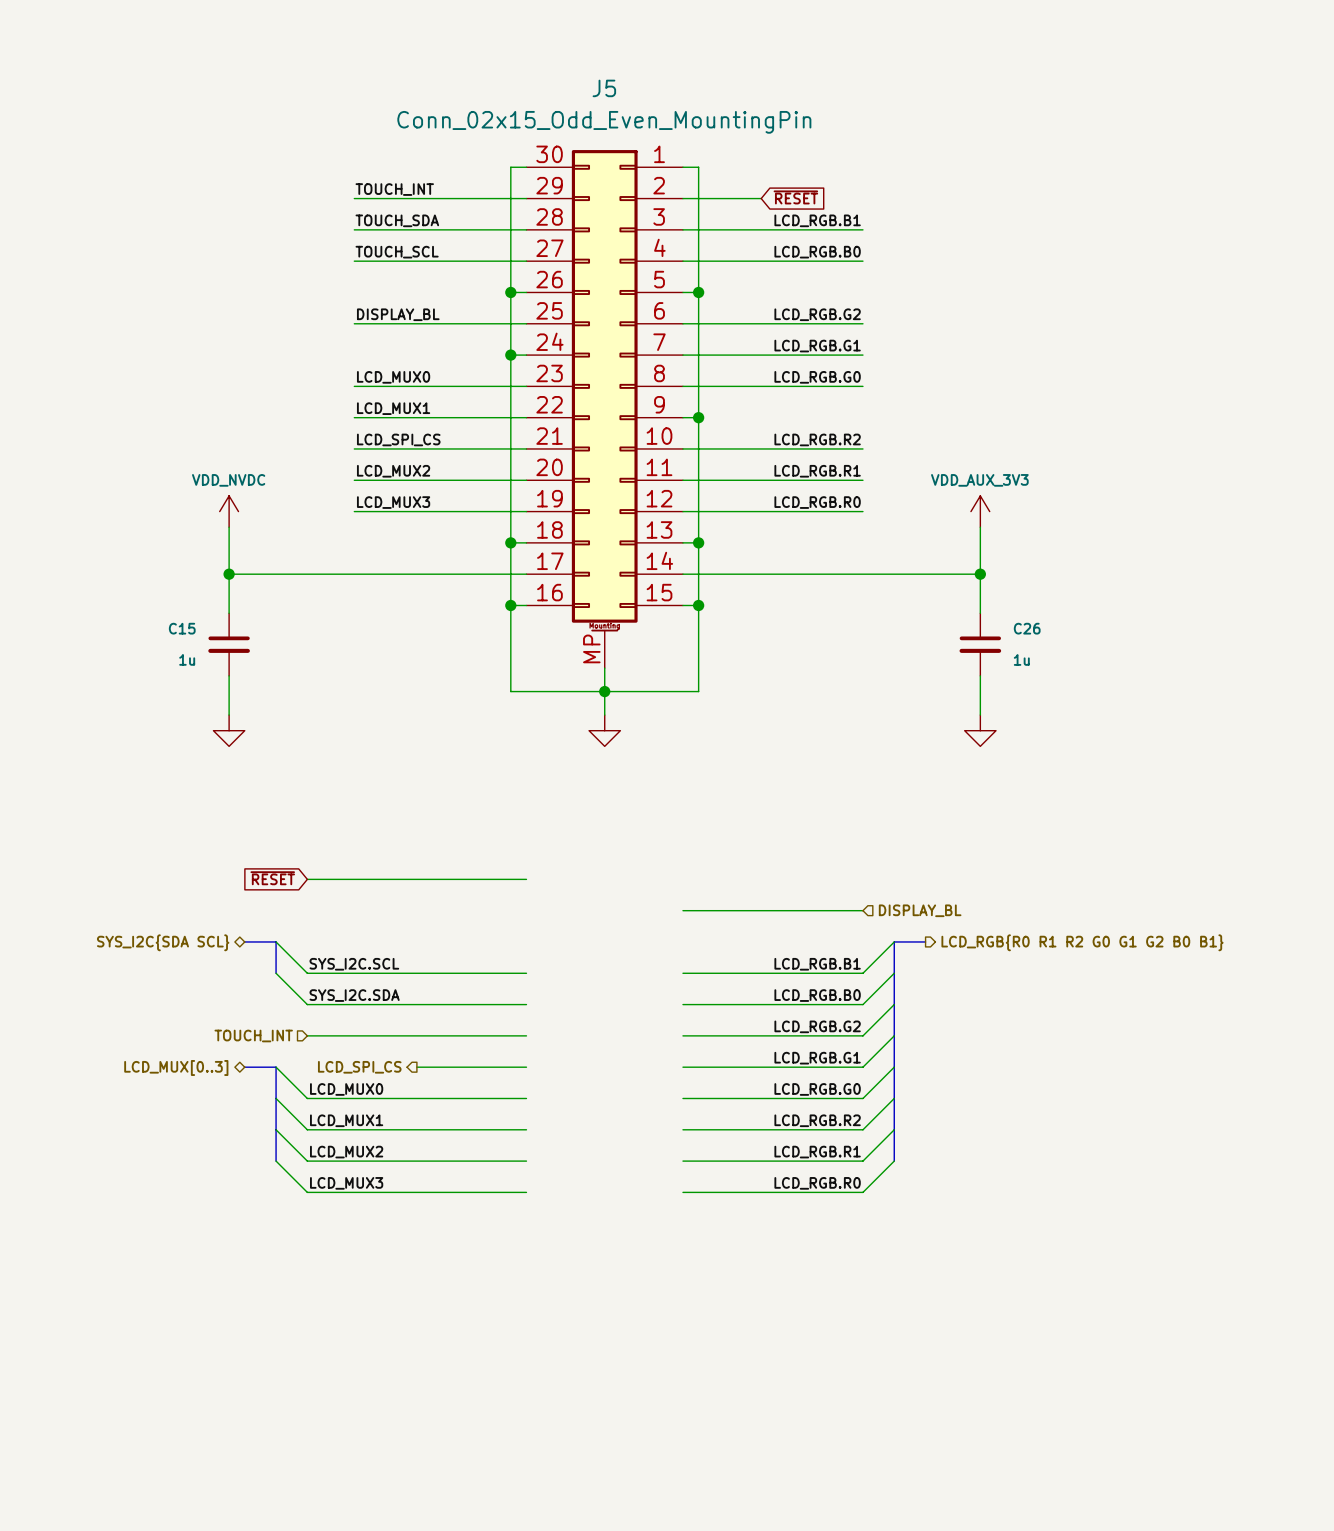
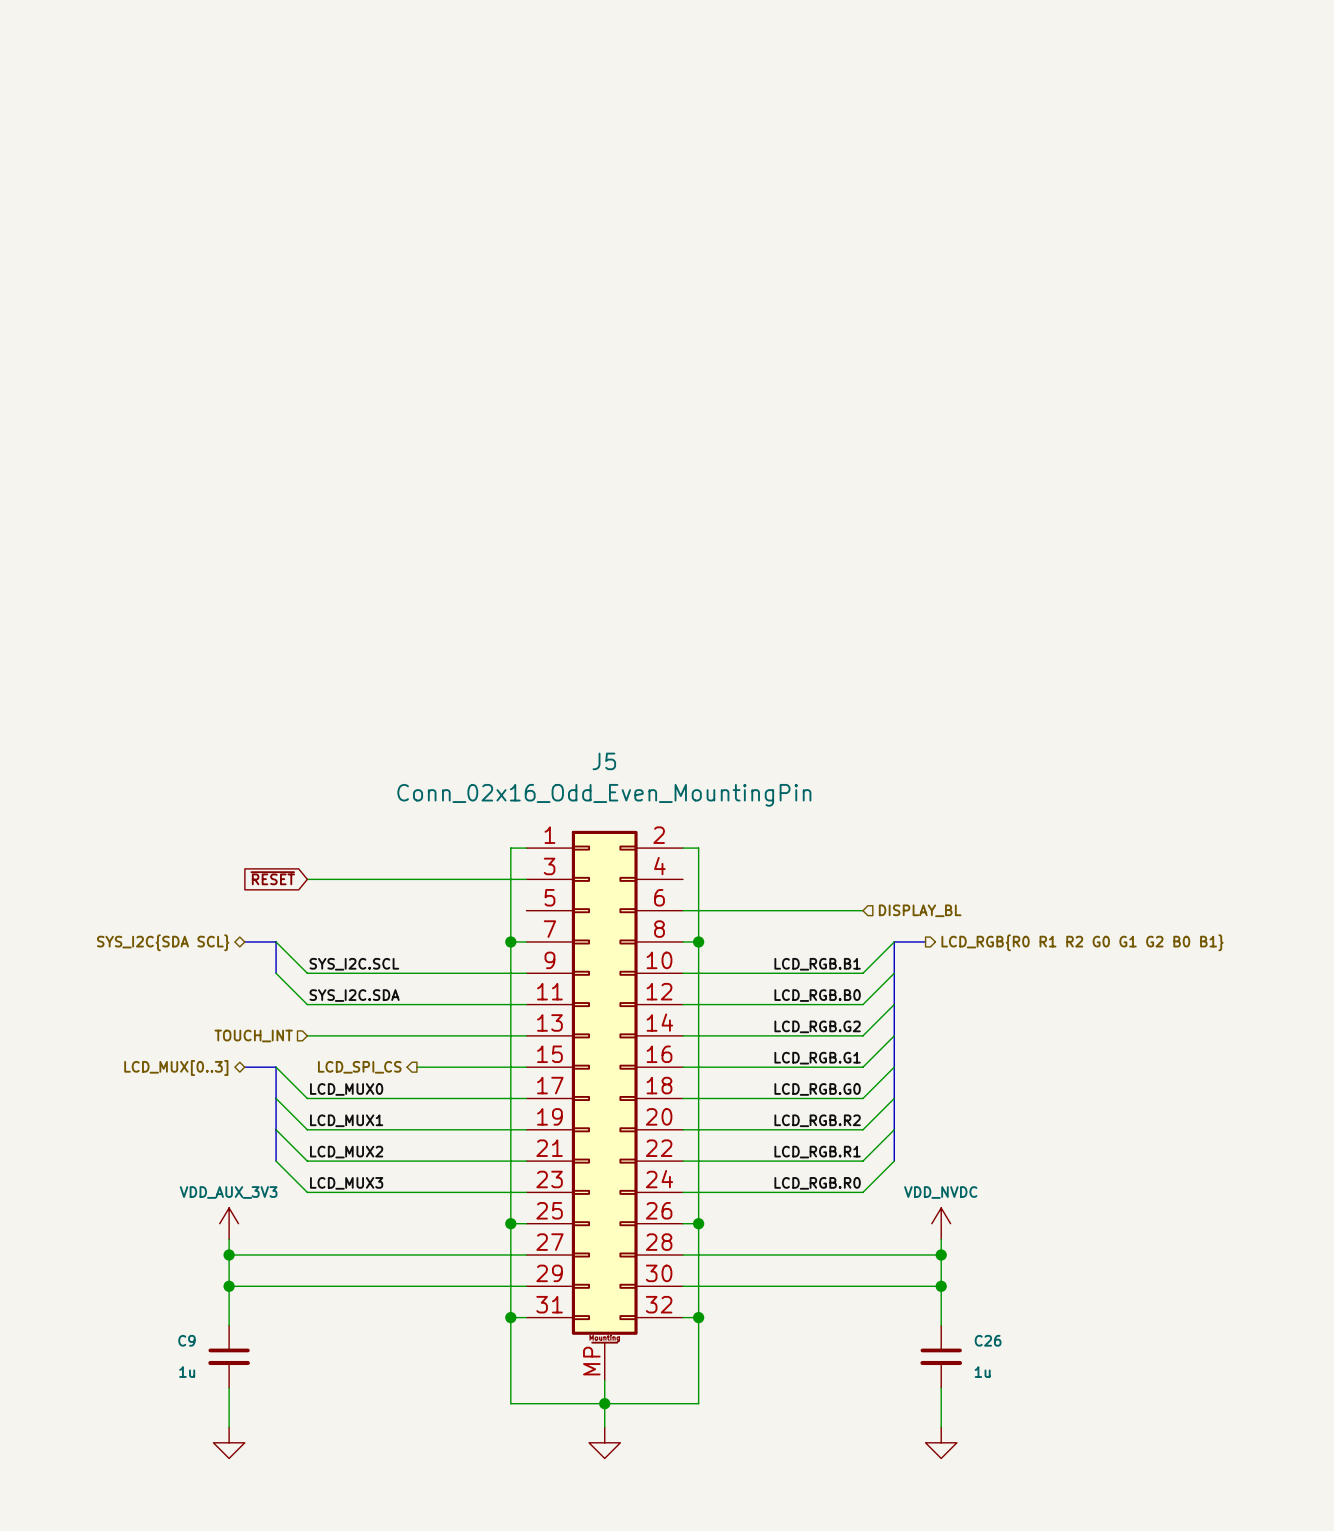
J5 value: Conn_02x15_Odd_Even_MountingPin (604, 122) -> Conn_02x16_Odd_Even_MountingPin (604, 795)
J5 symbol: [526, 150, 683, 669] -> [526, 830, 683, 1381]
wire: (526, 167) (510, 167) (510, 691) (698, 691) (698, 167) (682, 167) -> none
label: TOUCH_INT (394, 189) -> none
global label: ~{RESET} (795, 197) -> none
wire: (354, 198) (526, 198) -> none
wire: (682, 198) (761, 198) -> none
label: TOUCH_SDA (397, 220) -> none
label: LCD_RGB.B1 (817, 220) -> none
wire: (354, 229) (526, 229) -> none
wire: (682, 229) (862, 229) -> none
label: TOUCH_SCL (397, 252) -> none
label: LCD_RGB.B0 (817, 252) -> none
wire: (354, 261) (526, 261) -> none
wire: (682, 261) (862, 261) -> none
wire: (510, 292) (526, 292) -> none
junction: (510, 292) -> none
wire: (682, 292) (698, 292) -> none
junction: (698, 292) -> none
label: DISPLAY_BL (398, 314) -> none
label: LCD_RGB.G2 (817, 314) -> none
wire: (354, 323) (526, 323) -> none
wire: (682, 323) (862, 323) -> none
label: LCD_RGB.G1 (817, 346) -> none
wire: (510, 355) (526, 355) -> none
junction: (510, 355) -> none
wire: (682, 355) (862, 355) -> none
label: LCD_MUX0 (393, 377) -> none
label: LCD_RGB.G0 (817, 377) -> none
wire: (354, 386) (526, 386) -> none
wire: (682, 386) (862, 386) -> none
label: LCD_MUX1 (393, 408) -> none
wire: (354, 417) (526, 417) -> none
wire: (682, 417) (698, 417) -> none
junction: (698, 417) -> none
label: LCD_SPI_CS (398, 439) -> none
label: LCD_RGB.R2 (817, 439) -> none
wire: (354, 448) (526, 448) -> none
wire: (682, 448) (862, 448) -> none
label: LCD_MUX2 (393, 471) -> none
label: LCD_RGB.R1 (817, 471) -> none
wire: (354, 480) (526, 480) -> none
wire: (682, 480) (862, 480) -> none
label: LCD_MUX3 (393, 502) -> none
label: LCD_RGB.R0 (817, 502) -> none
power symbol: VDD_NVDC (229, 511) -> none
wire: (354, 511) (526, 511) -> none
wire: (682, 511) (862, 511) -> none
power symbol: VDD_AUX_3V3 (980, 511) -> none
wire: (229, 527) (229, 613) -> none
wire: (980, 527) (980, 613) -> none
wire: (510, 542) (526, 542) -> none
junction: (510, 542) -> none
wire: (682, 542) (698, 542) -> none
junction: (698, 542) -> none
wire: (229, 574) (526, 574) -> none
junction: (229, 574) -> none
wire: (682, 574) (980, 574) -> none
junction: (980, 574) -> none
wire: (510, 605) (526, 605) -> none
junction: (510, 605) -> none
wire: (682, 605) (698, 605) -> none
junction: (698, 605) -> none
C15: 1u (229, 644) -> none
C26 position: (980, 644) -> (941, 1356)
wire: (604, 668) (604, 715) -> none
wire: (229, 675) (229, 715) -> none
wire: (980, 675) (980, 715) -> none
junction: (604, 691) -> none
power symbol: (229, 730) -> none
power symbol: (604, 730) -> none
power symbol: (980, 730) -> none
wire: none -> (526, 848) (510, 848) (510, 941)
wire: none -> (682, 848) (698, 848) (698, 1403) (510, 1403) (510, 941)
wire: none -> (510, 941) (526, 941)
junction: none -> (510, 941)
wire: none -> (682, 941) (698, 941)
junction: none -> (698, 941)
power symbol: none -> VDD_AUX_3V3 (229, 1223)
wire: none -> (510, 1223) (526, 1223)
junction: none -> (510, 1223)
wire: none -> (682, 1223) (698, 1223)
junction: none -> (698, 1223)
power symbol: none -> VDD_NVDC (941, 1223)
wire: none -> (229, 1239) (229, 1325)
wire: none -> (941, 1239) (941, 1325)
wire: none -> (229, 1255) (526, 1255)
junction: none -> (229, 1255)
wire: none -> (682, 1255) (941, 1255)
junction: none -> (941, 1255)
wire: none -> (229, 1286) (526, 1286)
junction: none -> (229, 1286)
wire: none -> (682, 1286) (941, 1286)
junction: none -> (941, 1286)
wire: none -> (510, 1317) (526, 1317)
junction: none -> (510, 1317)
wire: none -> (682, 1317) (698, 1317)
junction: none -> (698, 1317)
C9: none -> 1u (229, 1356)
wire: none -> (604, 1380) (604, 1427)
wire: none -> (229, 1388) (229, 1427)
wire: none -> (941, 1388) (941, 1427)
junction: none -> (604, 1403)
power symbol: none -> (229, 1442)
power symbol: none -> (604, 1442)
power symbol: none -> (941, 1442)

